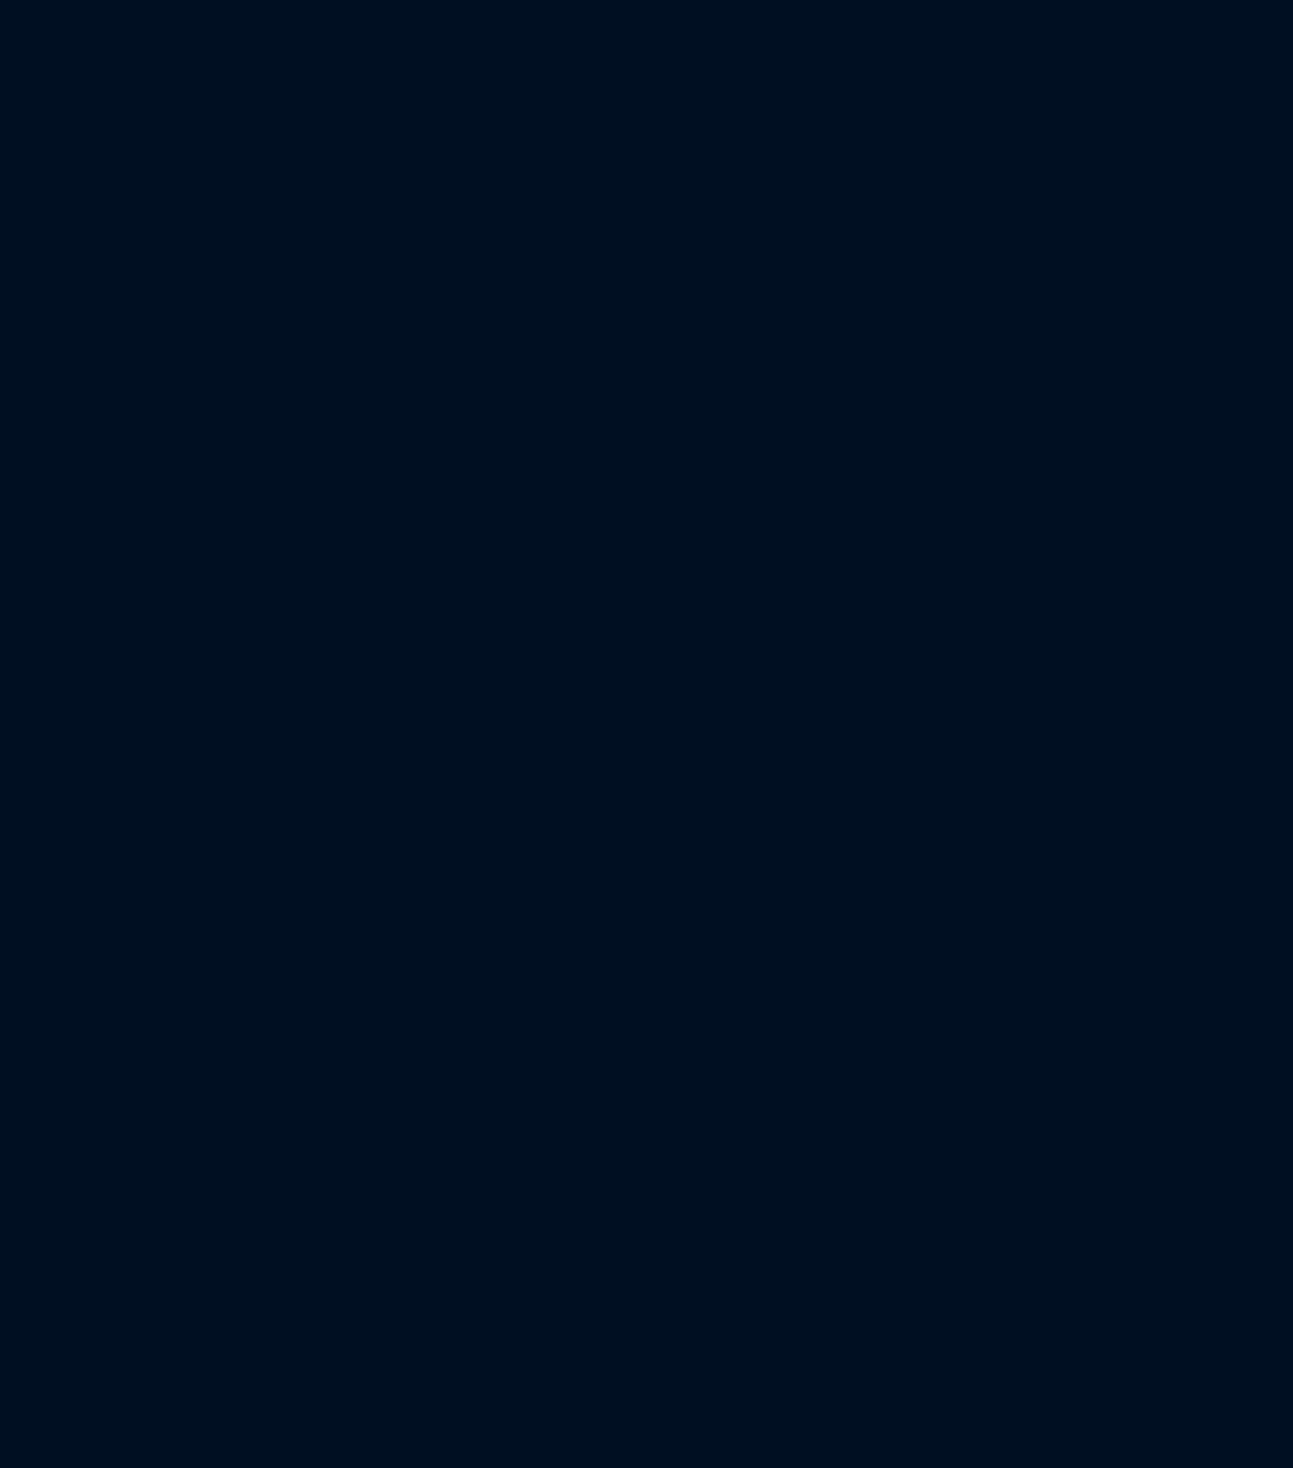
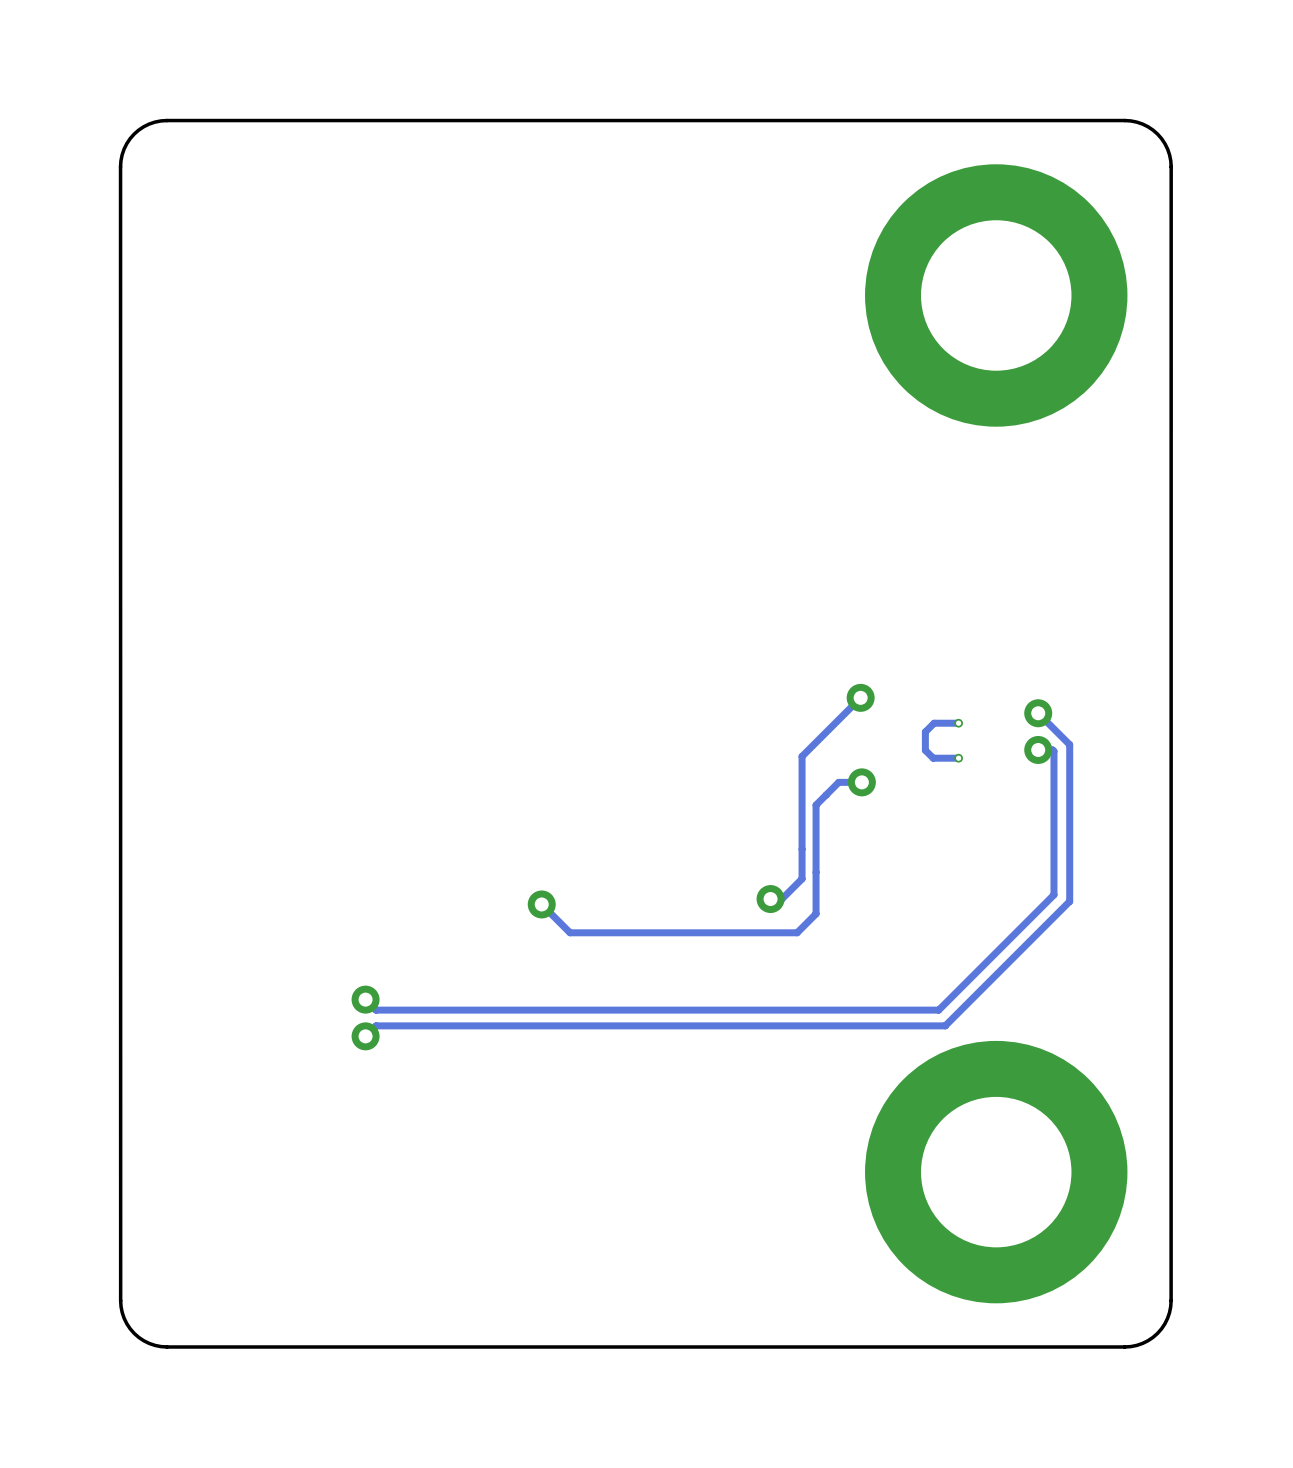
board edge: none -> (1124, 120) (166, 120) (149, 124) (138, 130) (130, 138) (124, 149) (120, 166) (120, 1300) (122, 1312) (126, 1323) (138, 1337) (149, 1343) (167, 1346) (1124, 1346) (1142, 1343) (1152, 1337) (1161, 1328) (1167, 1318) (1171, 1300) (1171, 166) (1167, 149) (1157, 134) (1142, 124) (1124, 120)
part: none -> (996, 295)
track: none -> (860, 697) (802, 756) (802, 878) (781, 899) (770, 899)
via: none -> (860, 697)
track: none -> (1038, 713) (1069, 744) (1069, 901) (945, 1025) (376, 1025) (365, 1036)
via: none -> (1038, 713)
track: none -> (958, 723) (934, 723) (925, 731) (925, 750) (933, 758) (958, 758)
via: none -> (958, 723)
track: none -> (1038, 749) (1053, 751) (1053, 894) (938, 1010) (376, 1010) (365, 999)
via: none -> (1038, 749)
via: none -> (958, 758)
track: none -> (861, 782) (838, 782) (816, 805) (816, 913) (797, 932) (570, 932) (541, 904)
via: none -> (861, 782)
via: none -> (770, 899)
via: none -> (541, 904)
via: none -> (365, 999)
via: none -> (365, 1036)
part: none -> (996, 1172)

